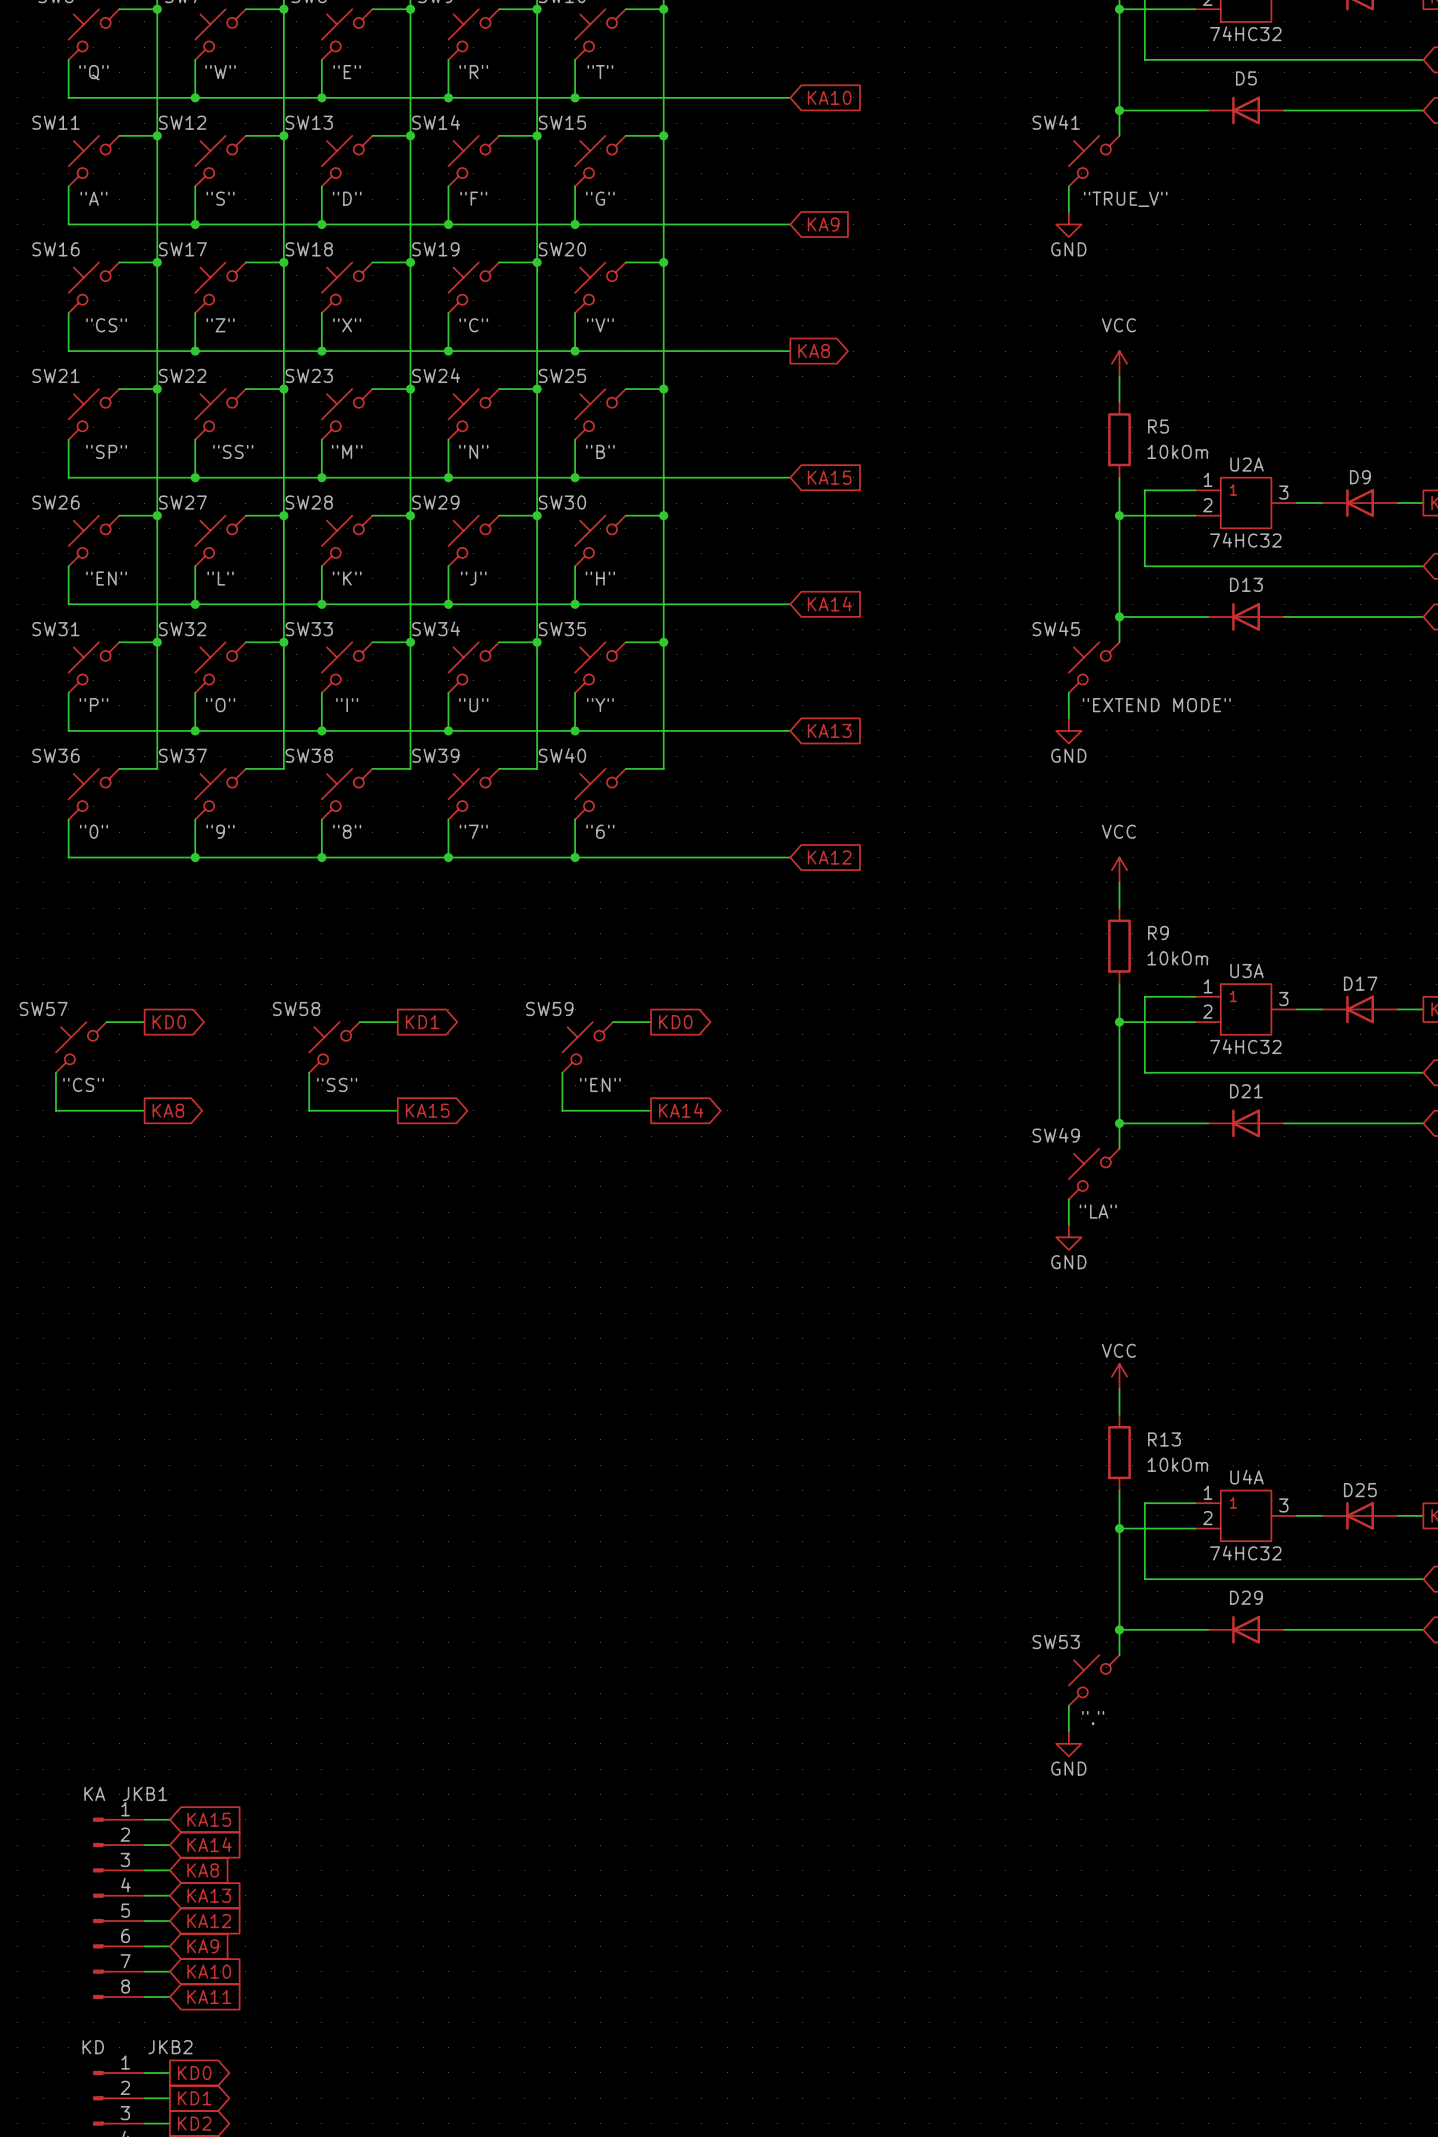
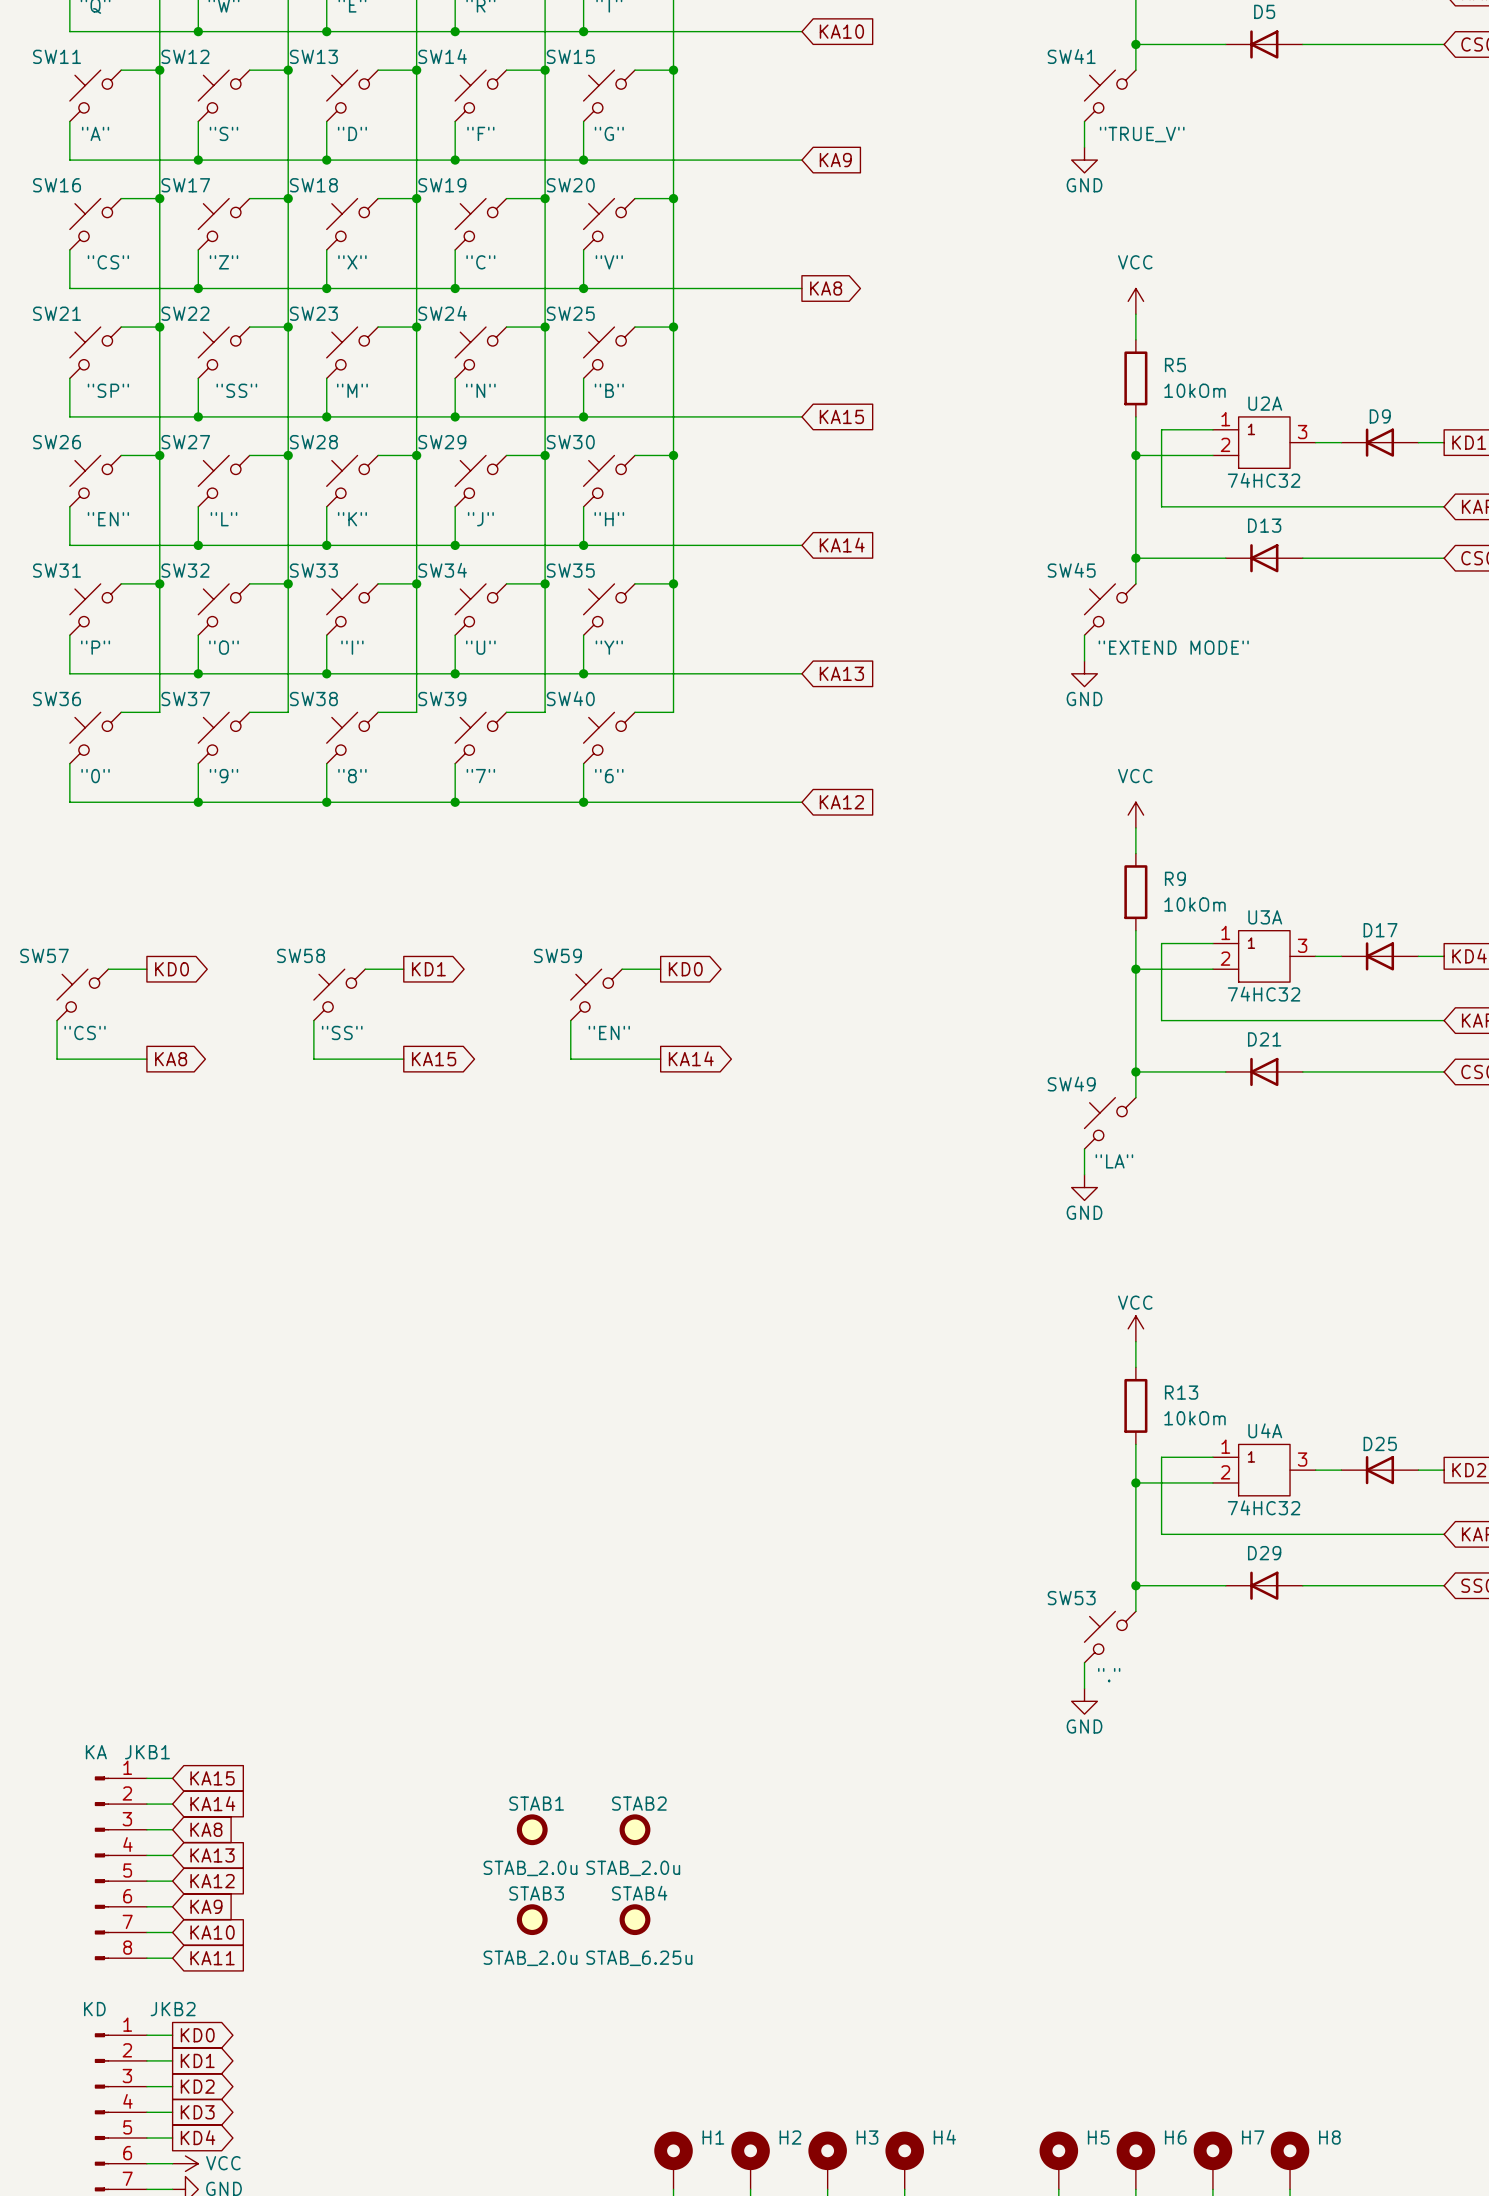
STAB1: none -> STAB_2.0u (532, 1829)
STAB2: none -> STAB_2.0u (634, 1829)
STAB3: none -> STAB_2.0u (532, 1919)
STAB4: none -> STAB_6.25u (634, 1919)

